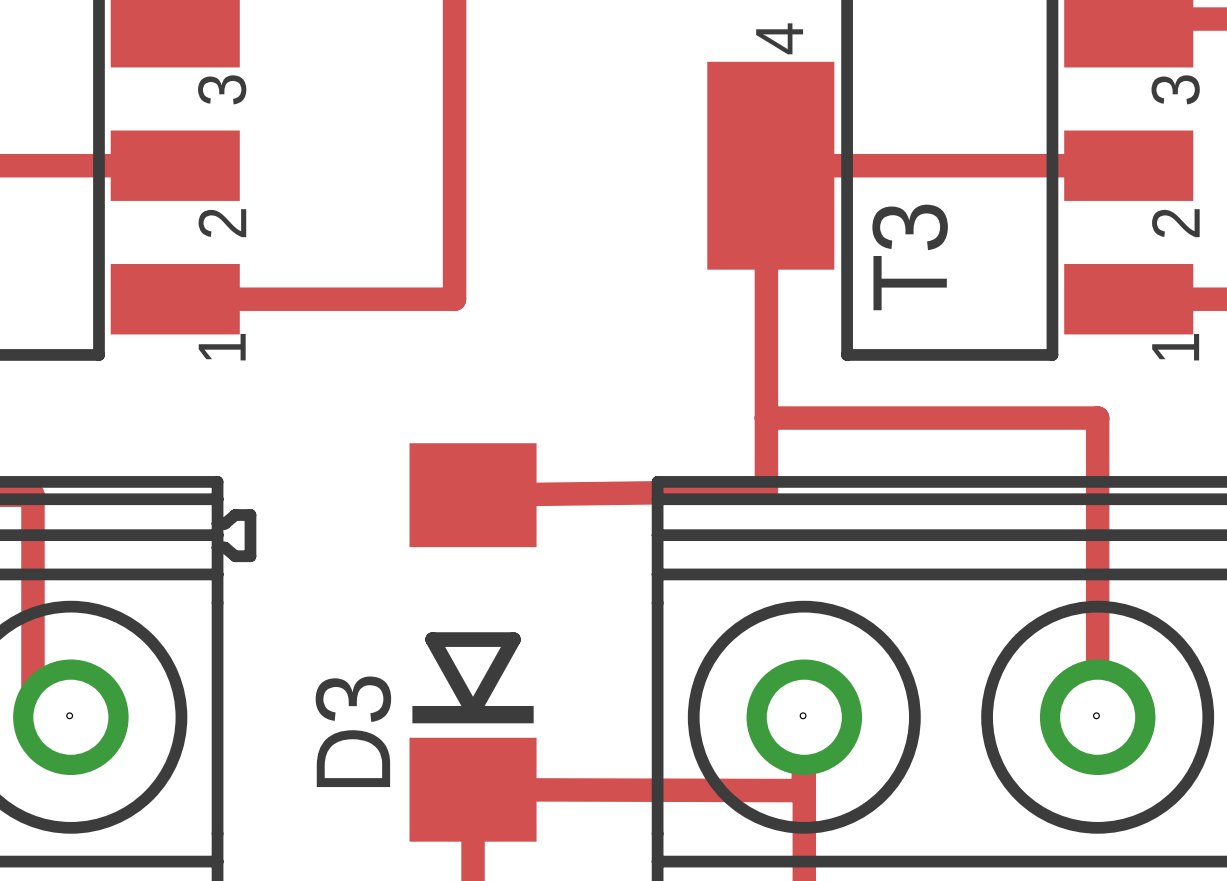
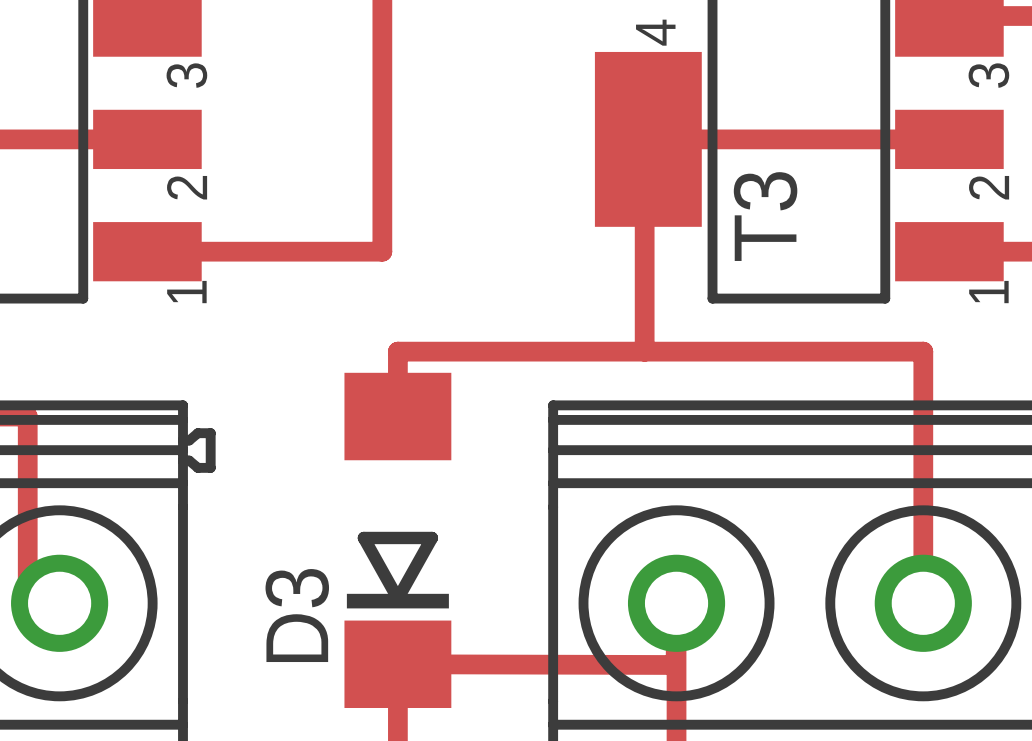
top track: (766, 418) (766, 491) (473, 495) -> (644, 351) (397, 351) (397, 416)
round board edge: [66, 712, 74, 720] -> none
round board edge: [799, 712, 807, 720] -> none
round board edge: [1092, 712, 1100, 720] -> none

